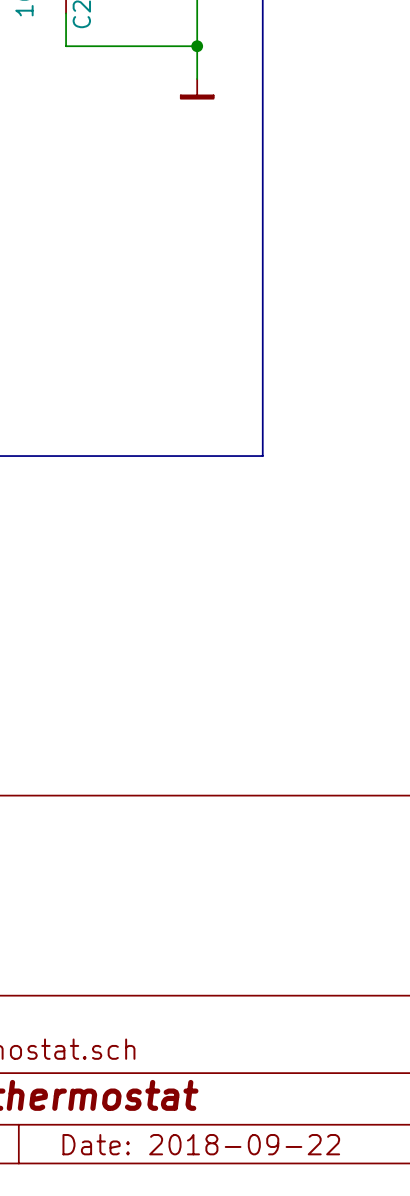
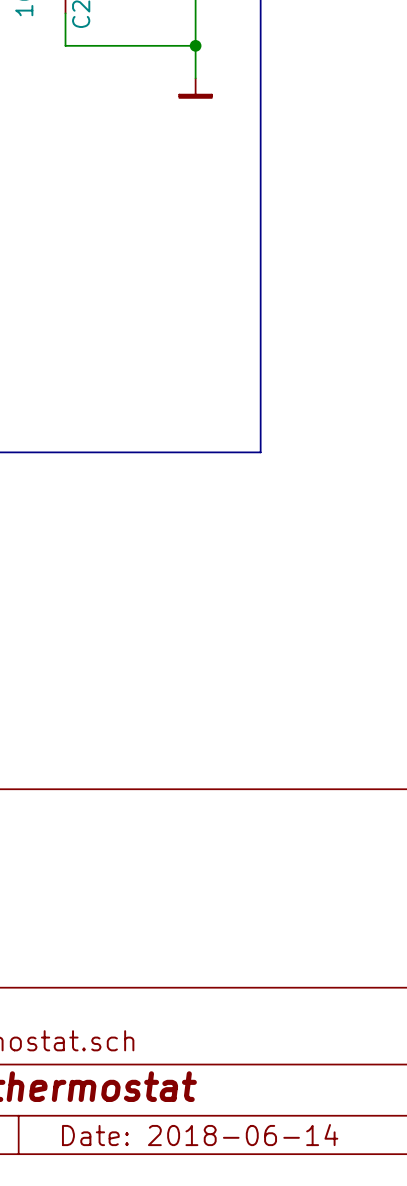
title block: Date: 2018-09-22 (201, 1144) -> Date: 2018-06-14 (200, 1135)

